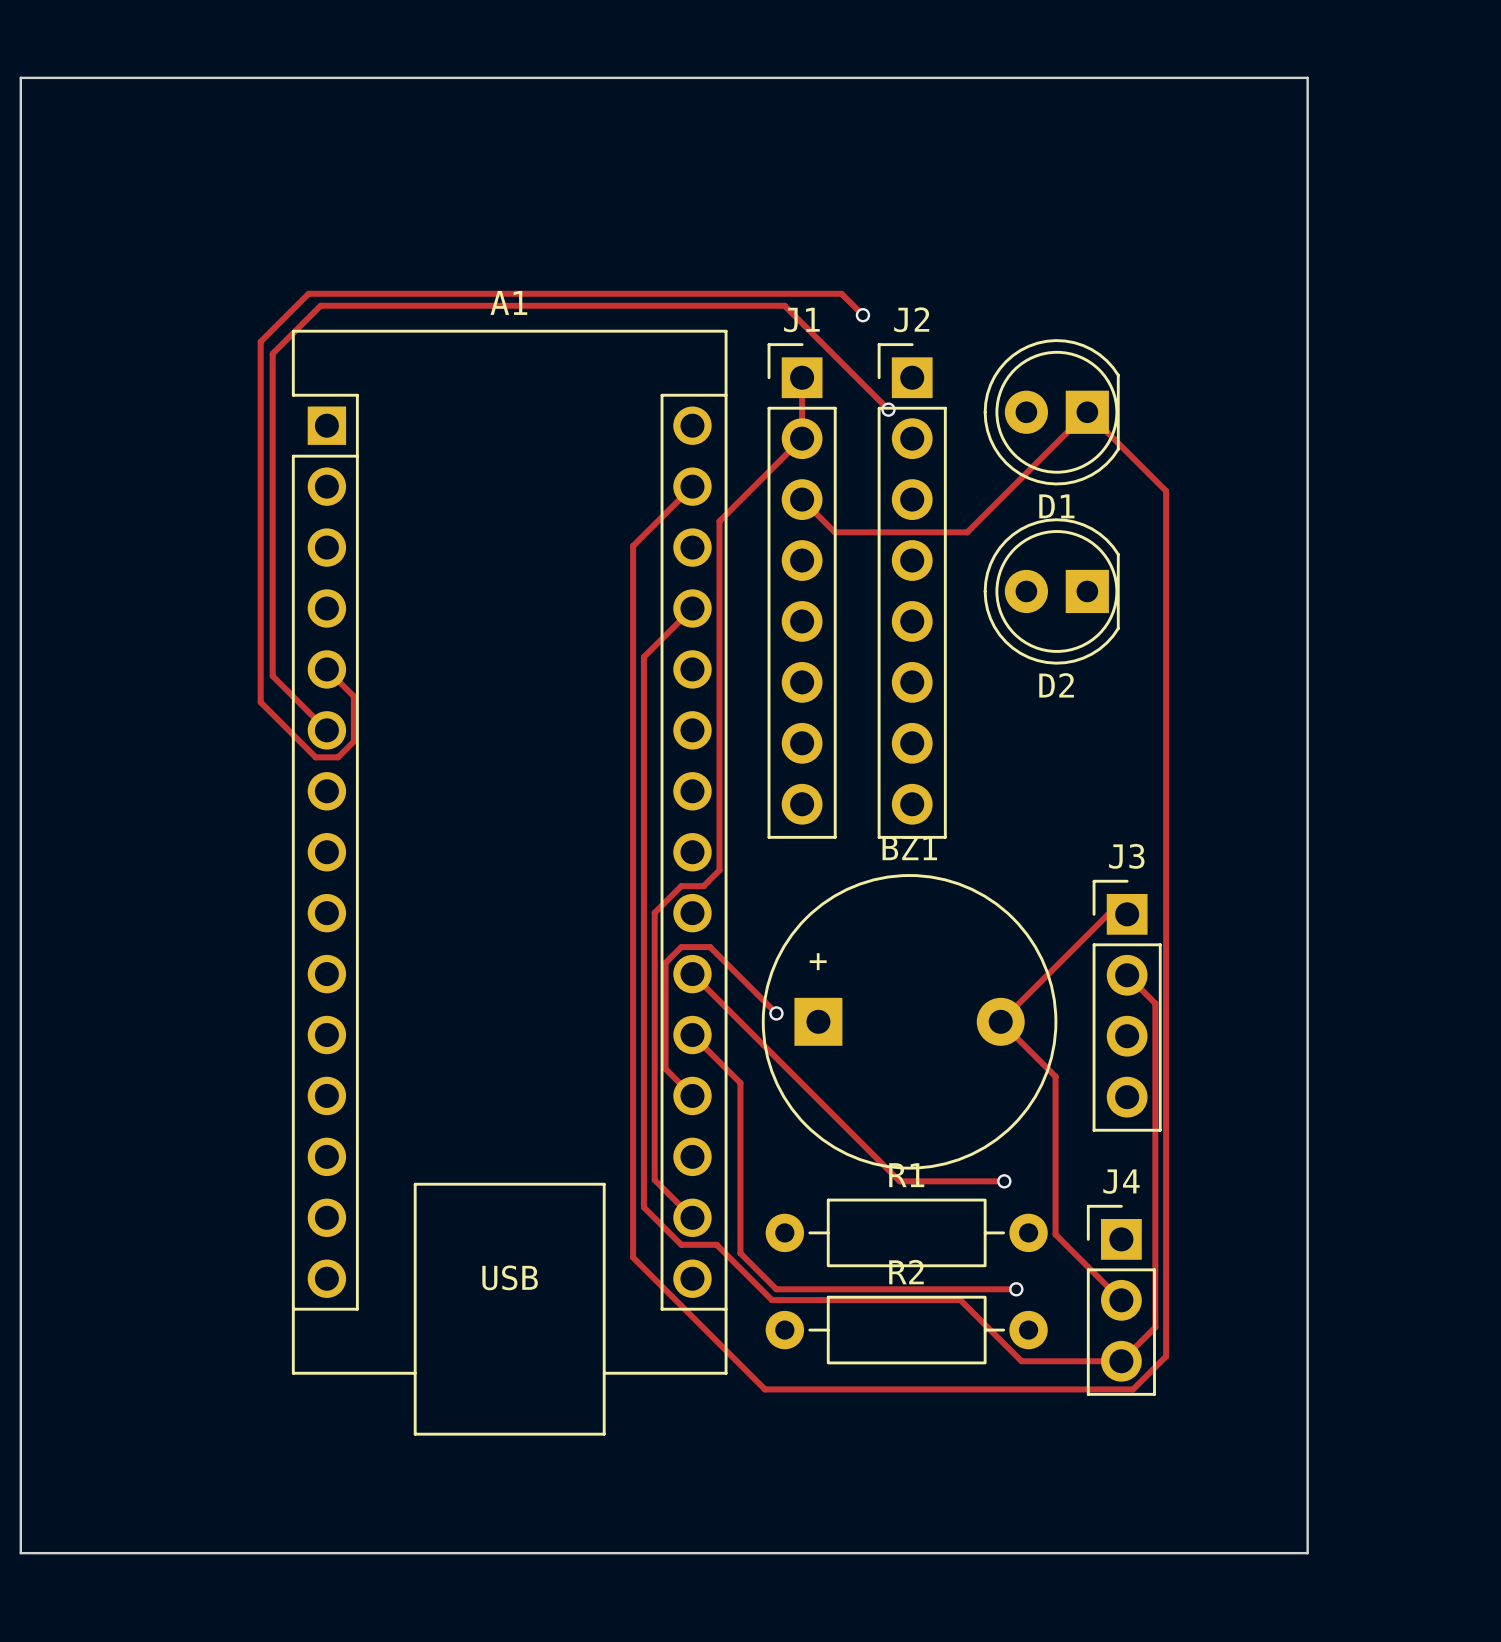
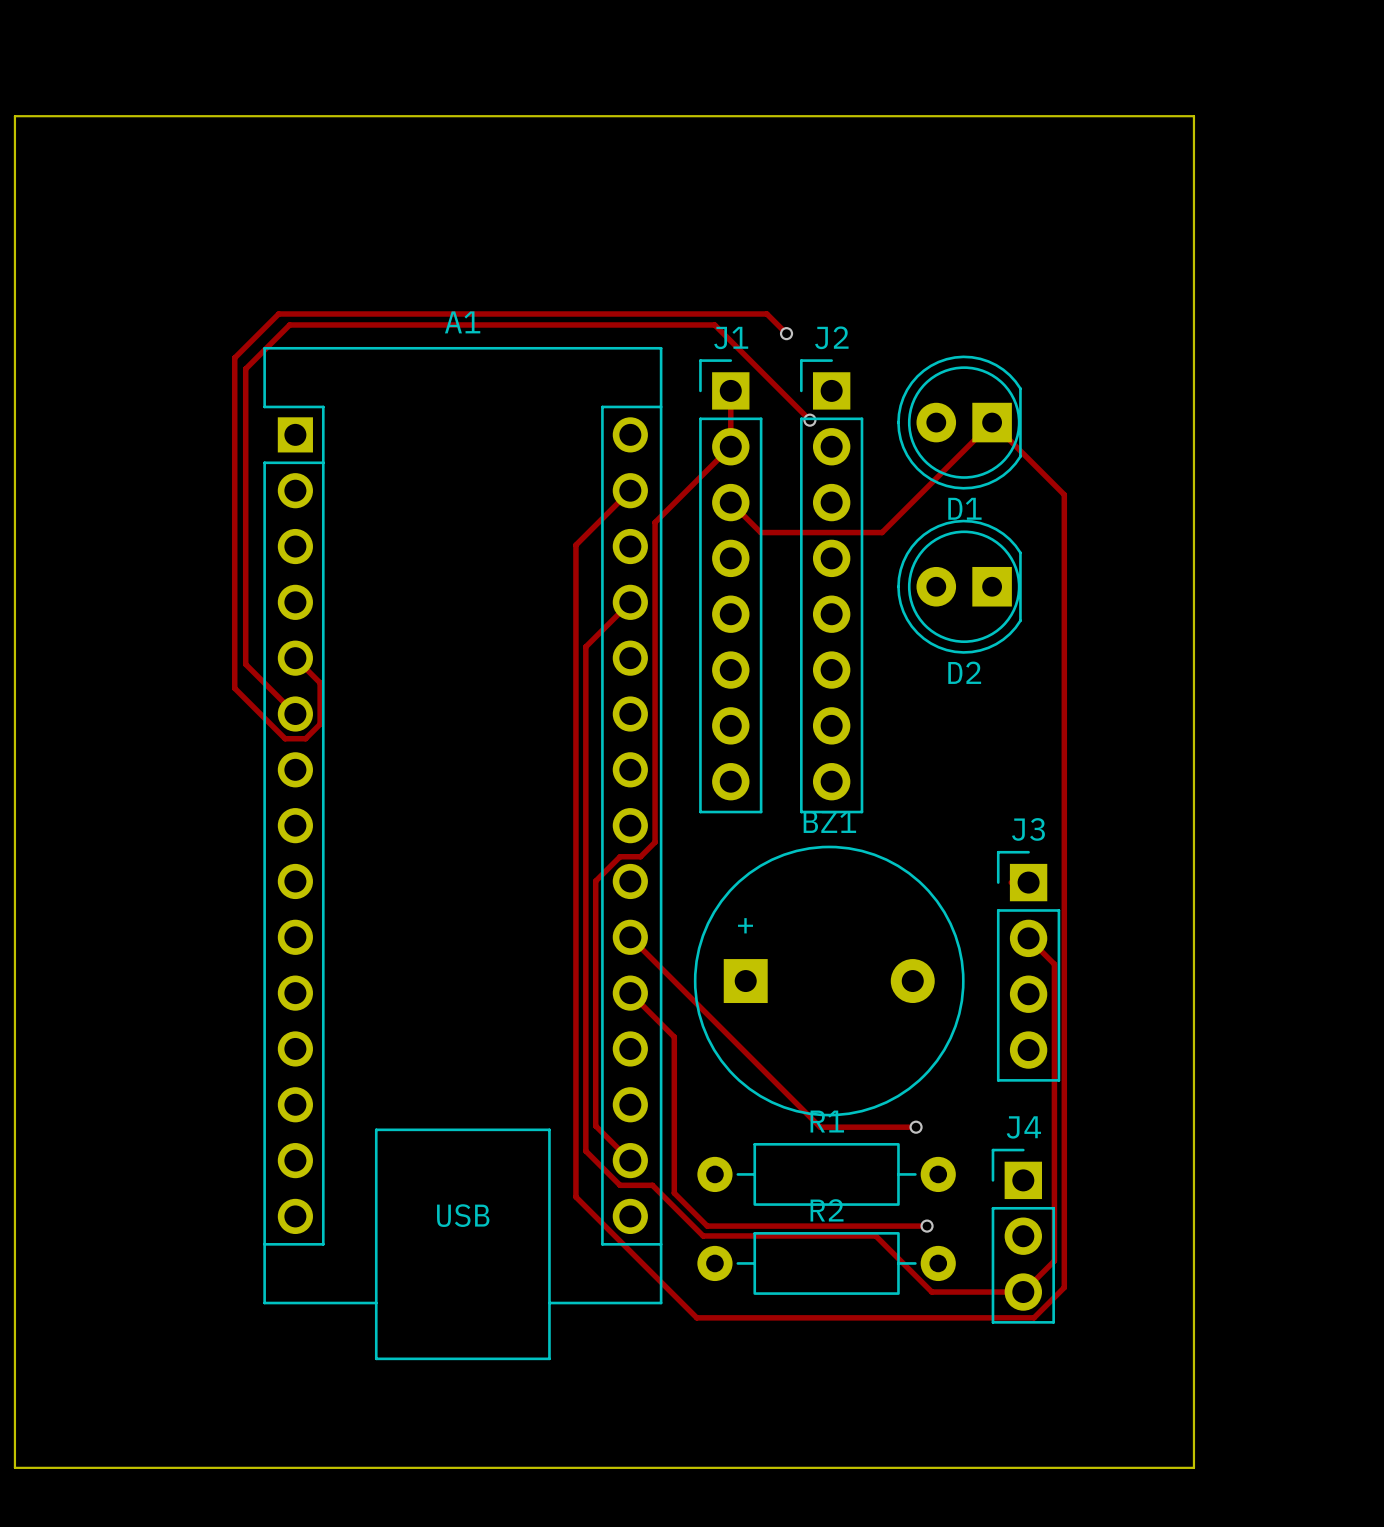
track: (1108, 914) (1000, 1021) (1055, 1076) (1055, 1234) (1121, 1300) -> none
track: (776, 1013) (710, 947) (681, 947) (665, 962) (665, 1068) (692, 1095) -> none
via: (776, 1013) -> none

